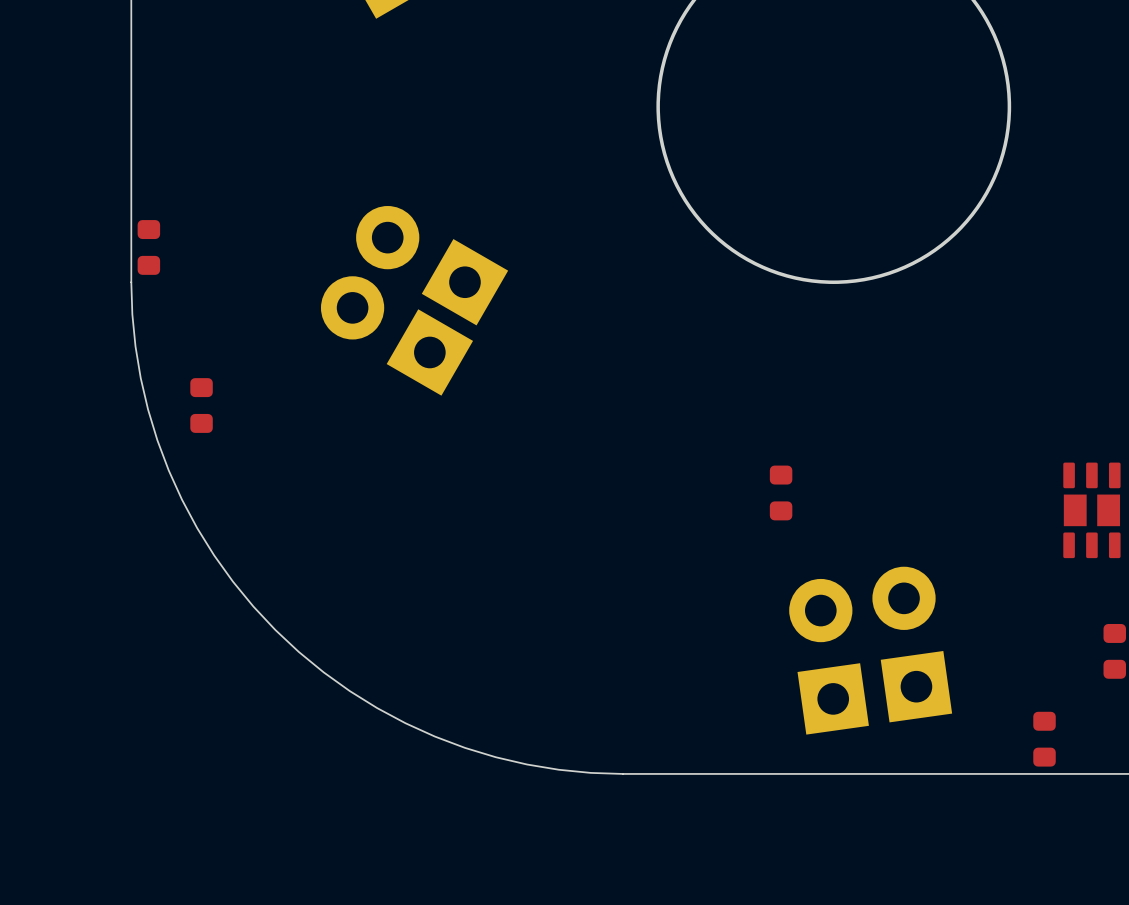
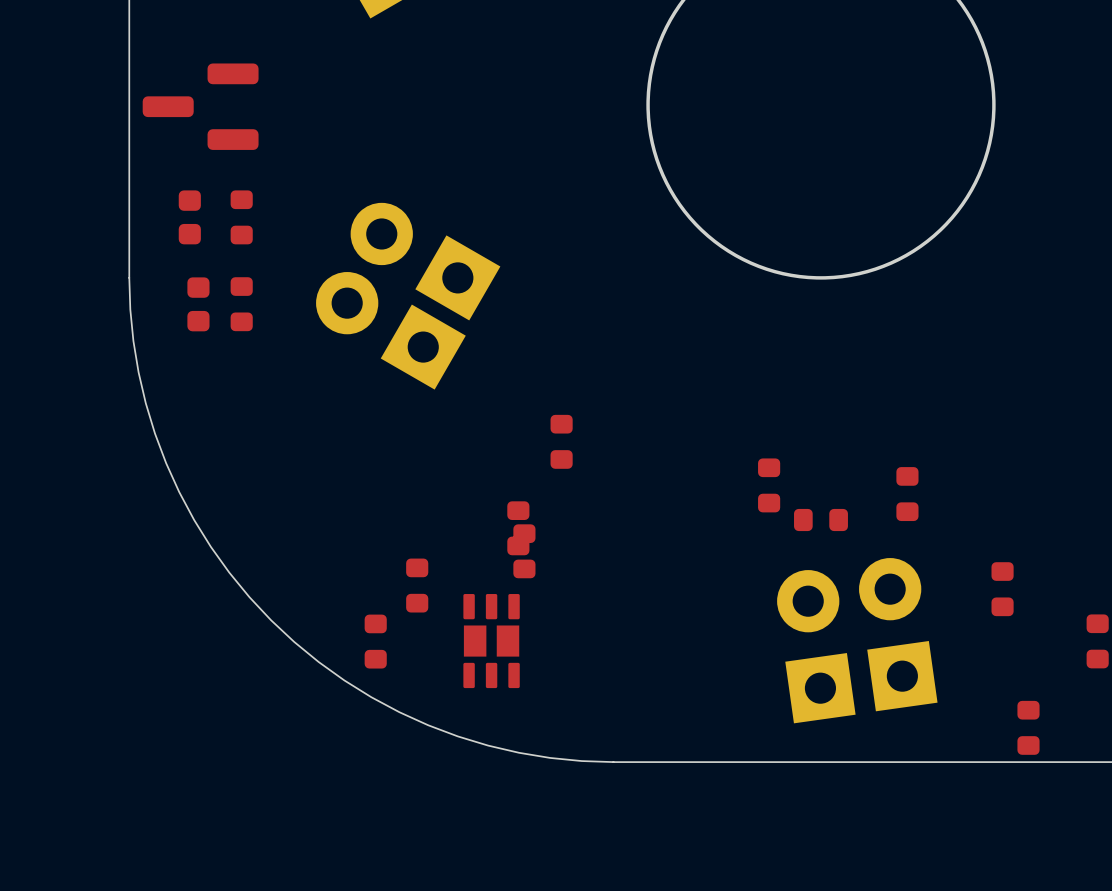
part: none -> (200, 106)
part: none -> (189, 217)
part: none -> (241, 217)
part: (148, 247) -> none
part: none -> (241, 304)
part: none -> (198, 304)
part: (201, 405) -> none
part: none -> (561, 441)
part: none -> (907, 494)
part position: (1091, 510) -> (491, 641)
part: none -> (820, 520)
part: none -> (518, 528)
part: none -> (524, 551)
part: none -> (417, 585)
part: none -> (1002, 589)
part: none -> (375, 641)

